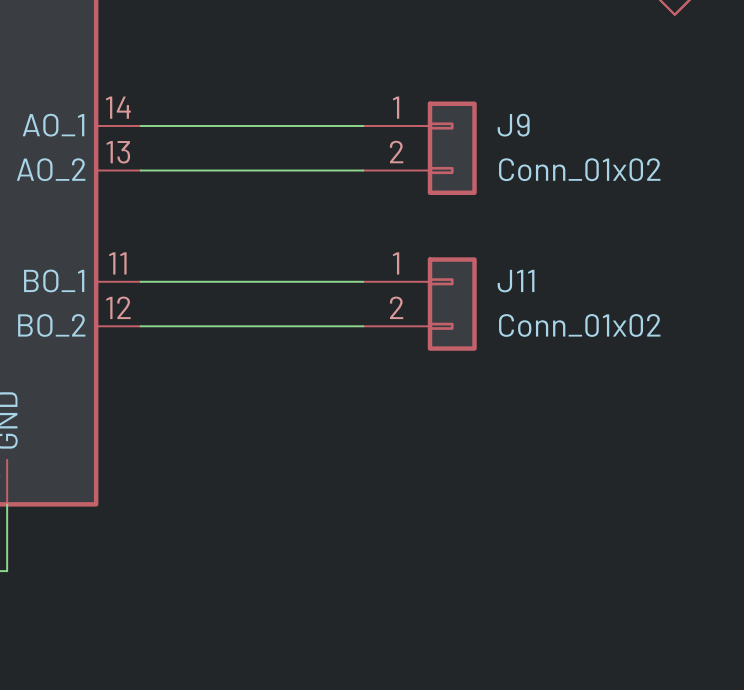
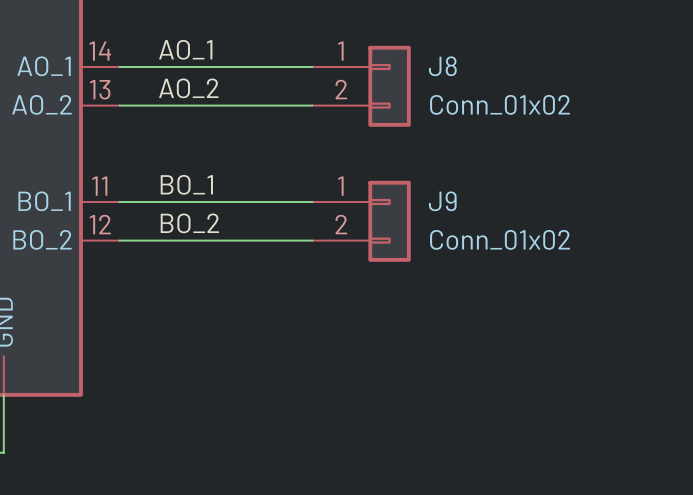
label: none -> AO_1 (185, 49)
J9 name: J9 (513, 125) -> J8 (442, 66)
label: none -> AO_2 (188, 88)
label: none -> BO_1 (186, 184)
J11 name: J11 (516, 281) -> J9 (442, 201)
label: none -> BO_2 (189, 223)

